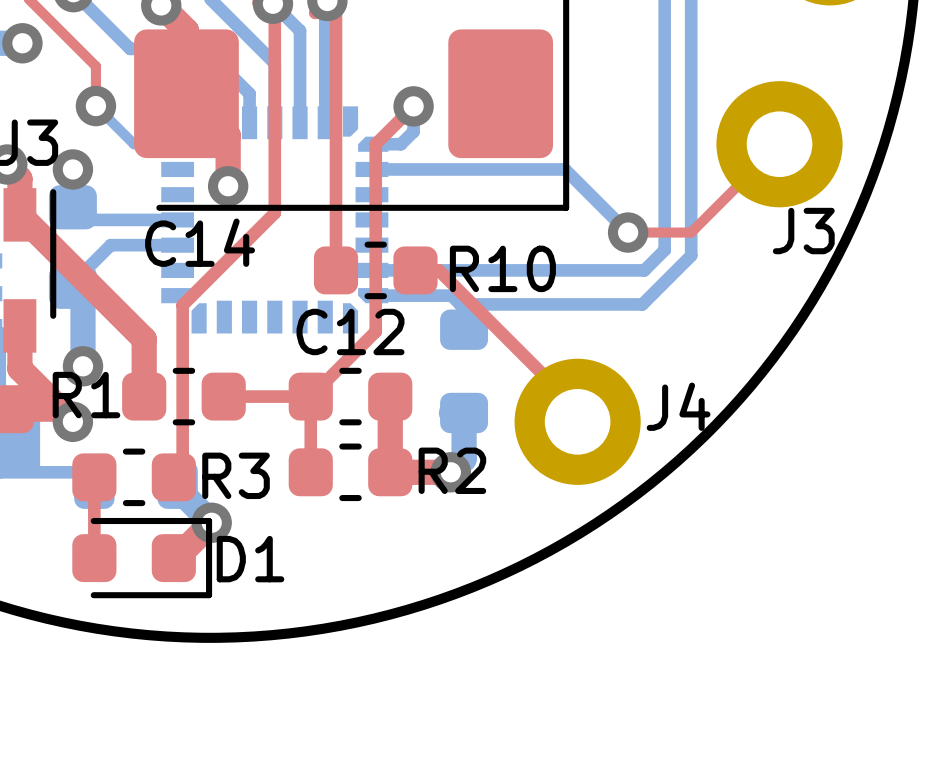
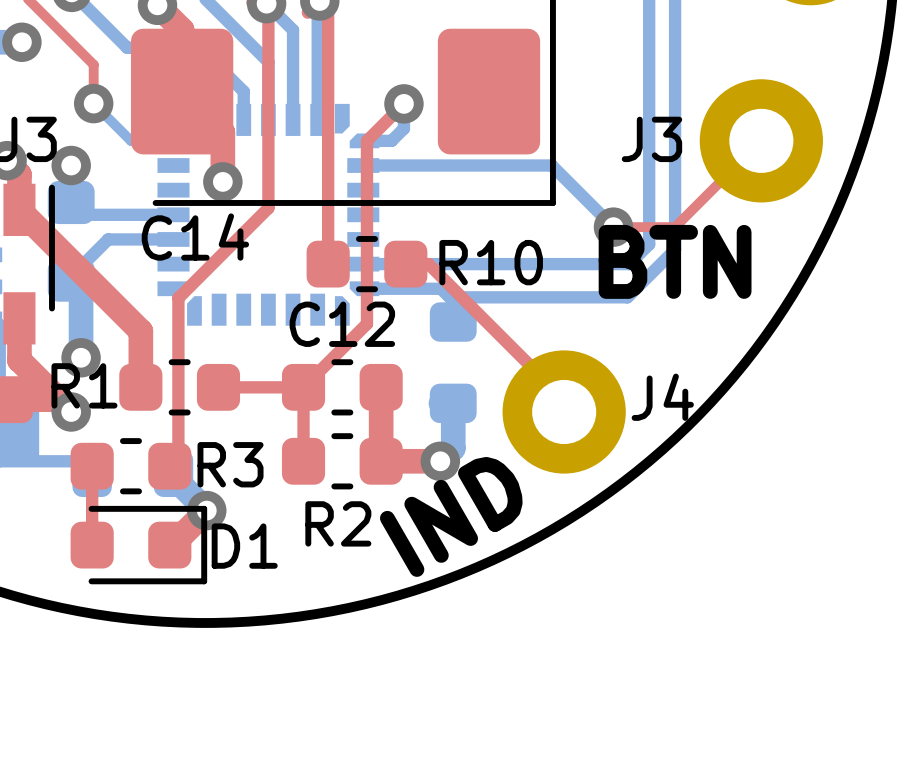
J3 name position: J3 (803, 231) -> J3 (651, 139)
text: none -> BTN (675, 261)
R2 name position: R2 (452, 470) -> R2 (338, 523)
text: none -> IND (451, 516)

